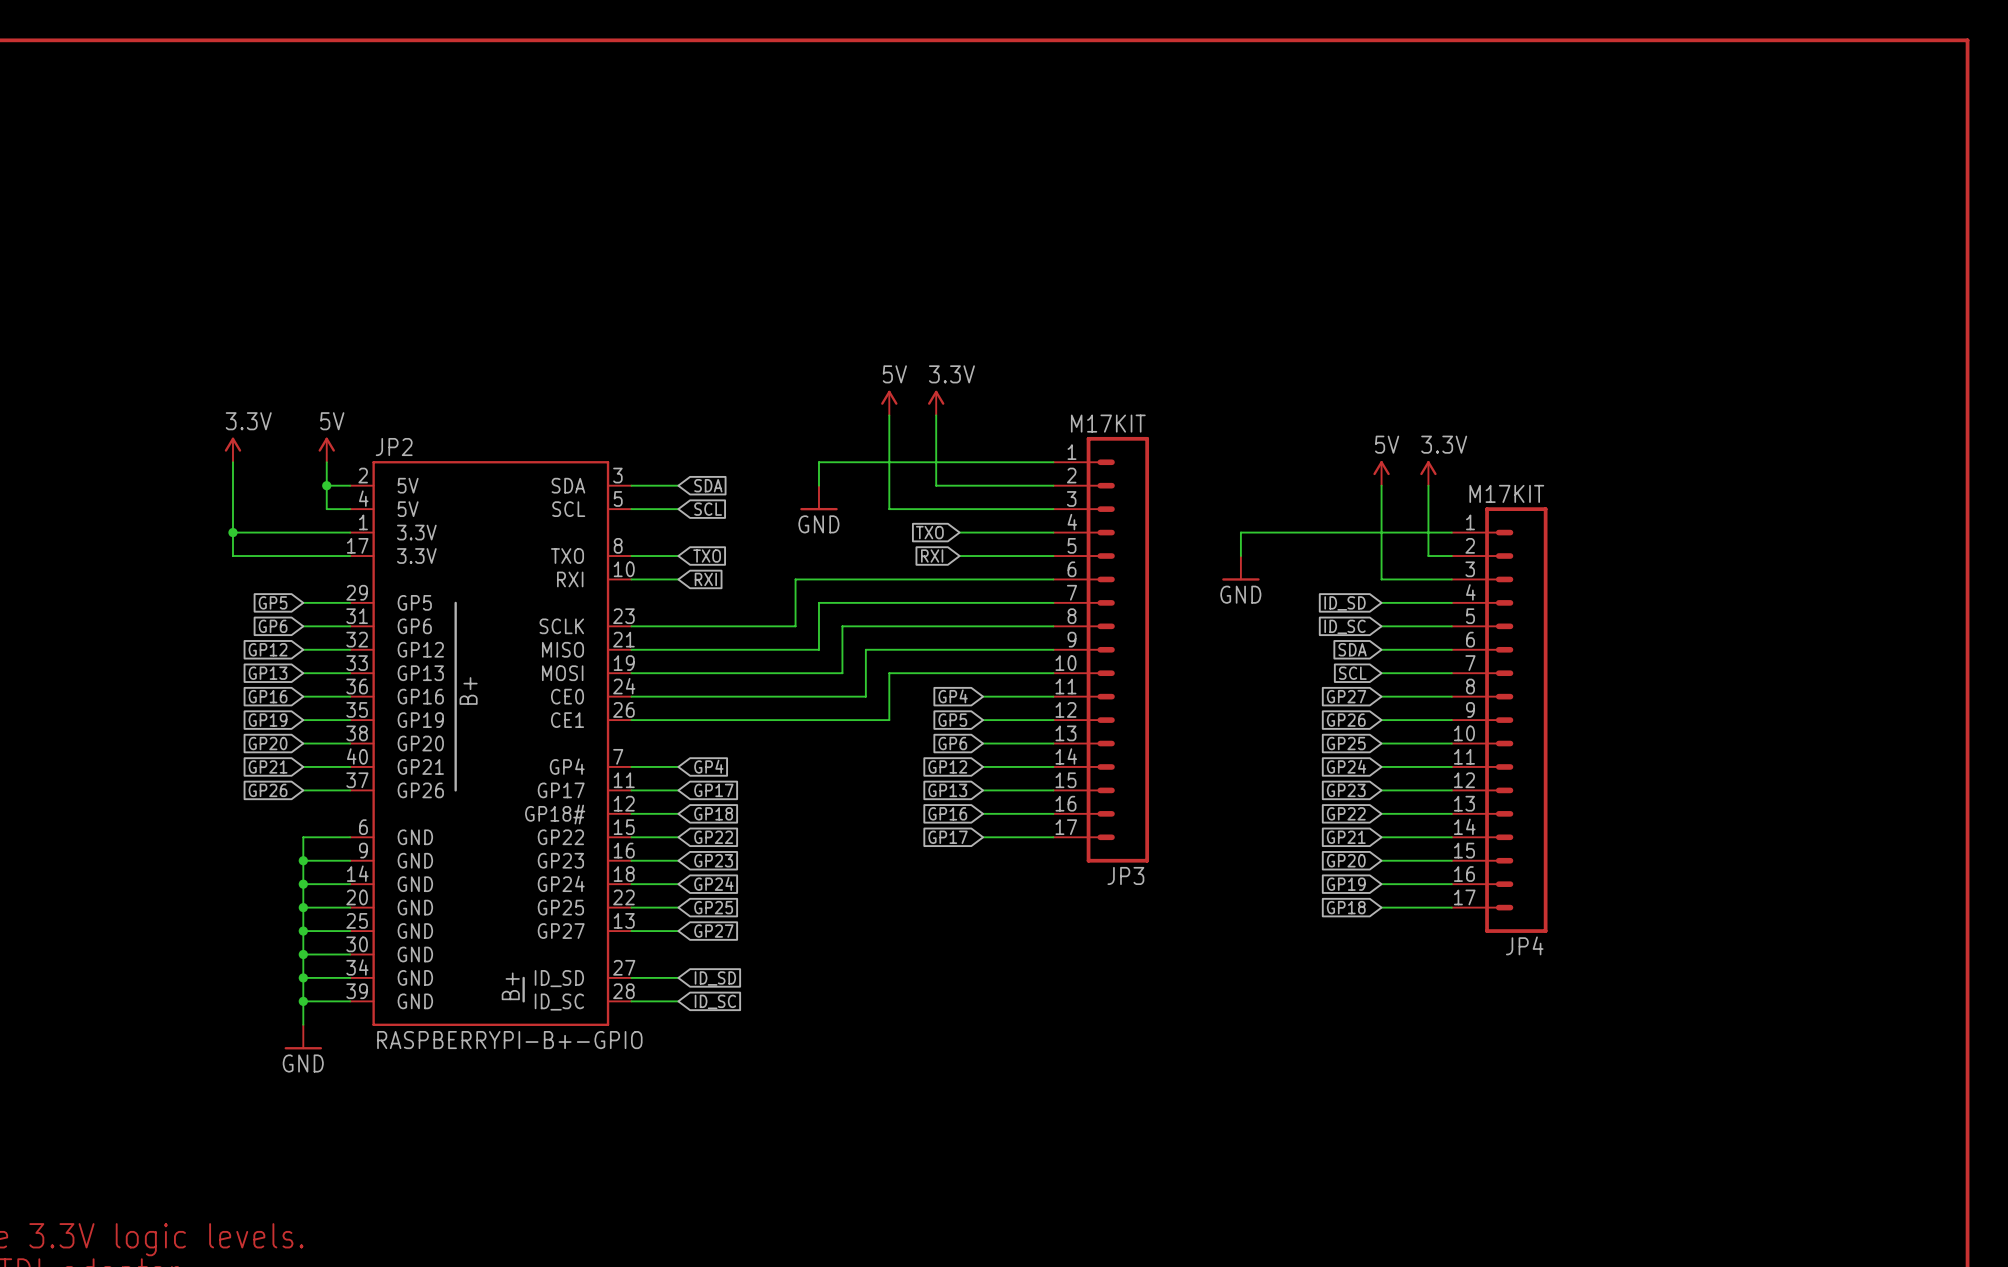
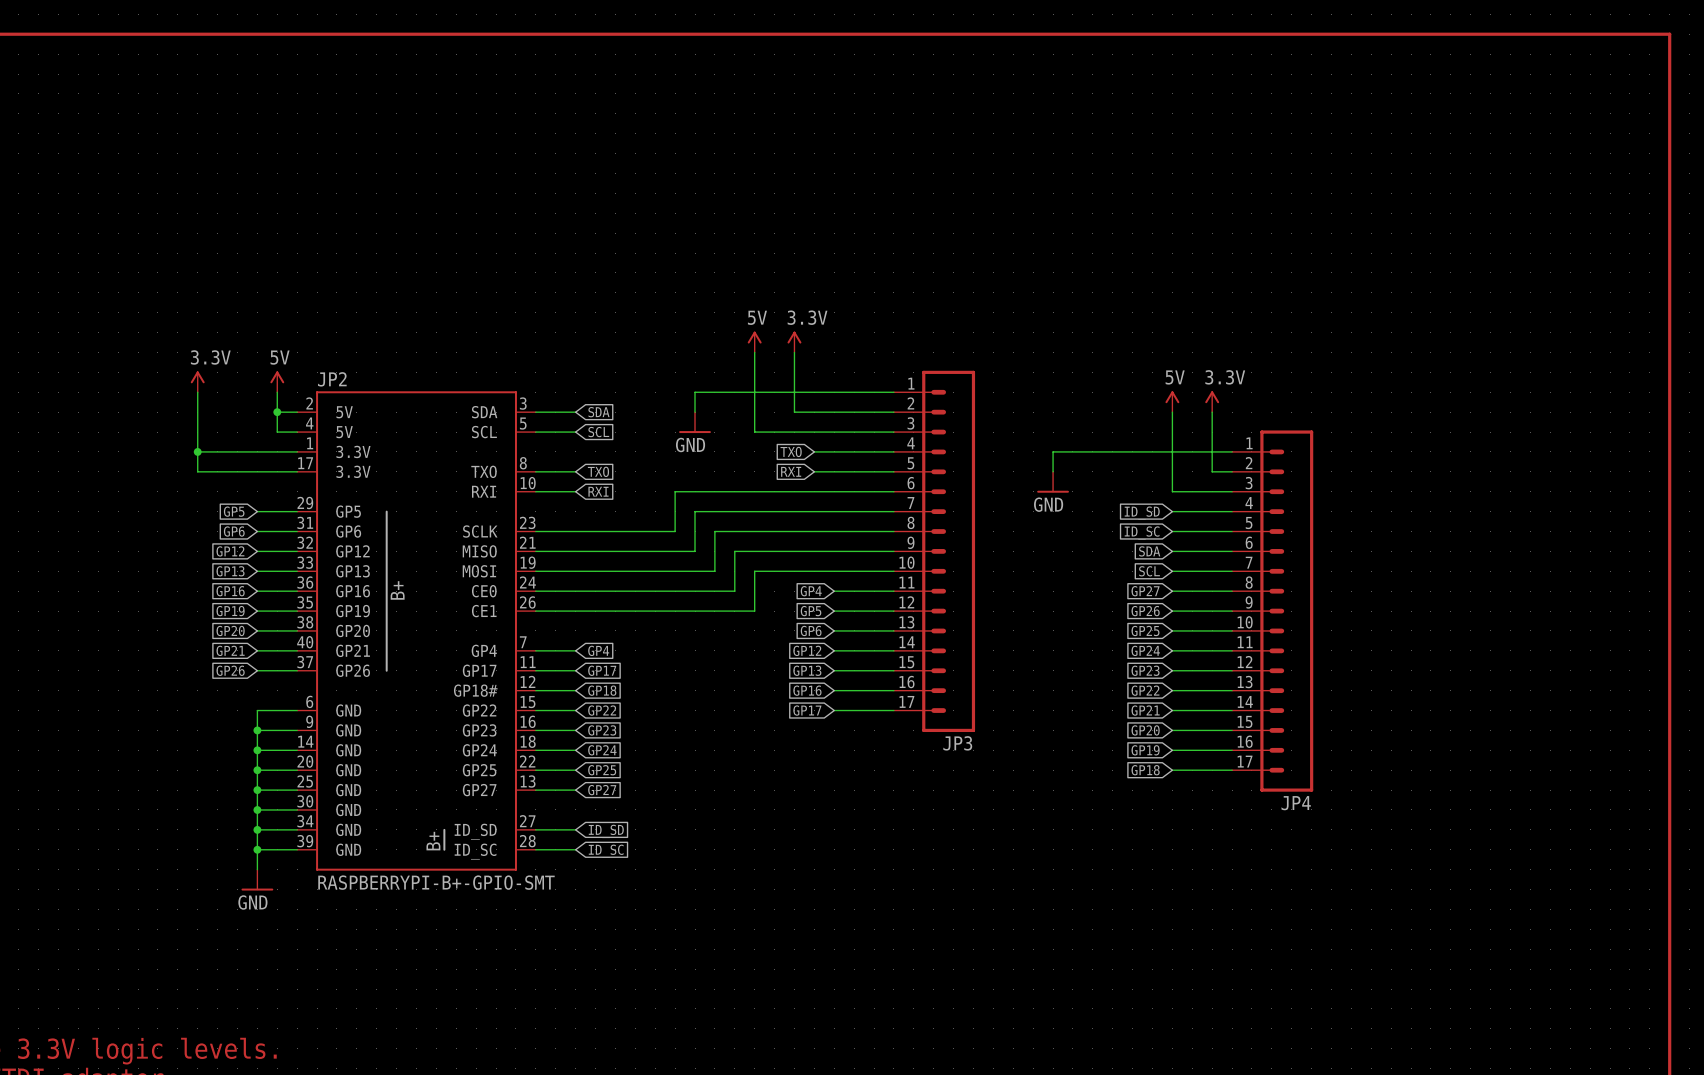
JP3 value: M17KIT (1108, 423) -> none
JP4 value: M17KIT (1506, 493) -> none
JP2 value: RASPBERRYPI-B+-GPIO (509, 1040) -> RASPBERRYPI-B+-GPIO-SMT (436, 882)

